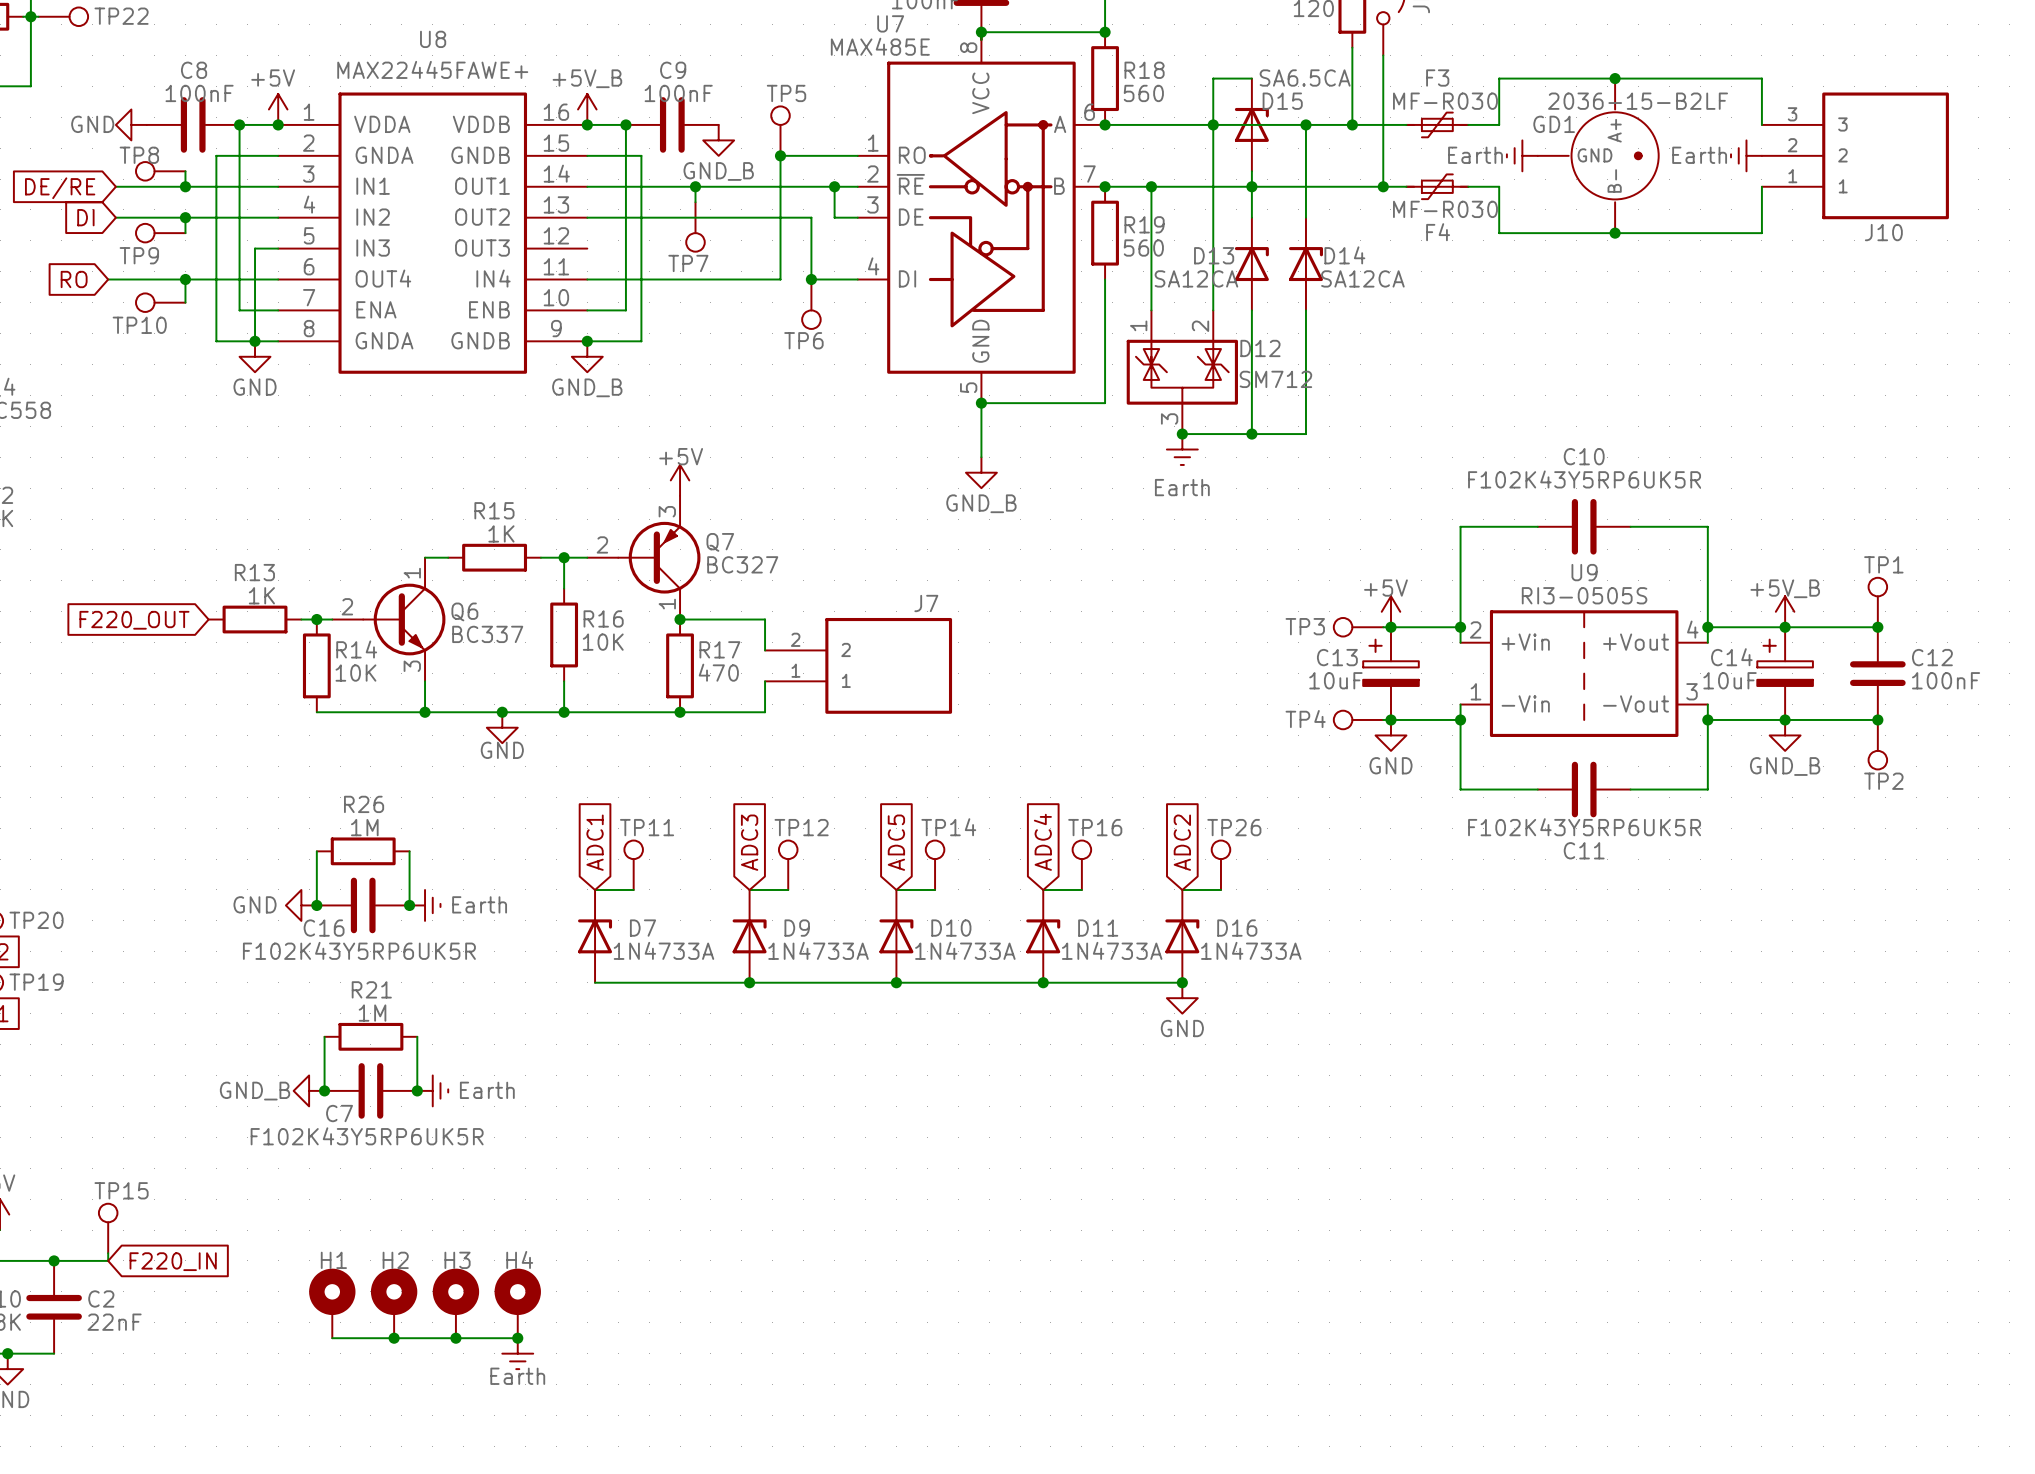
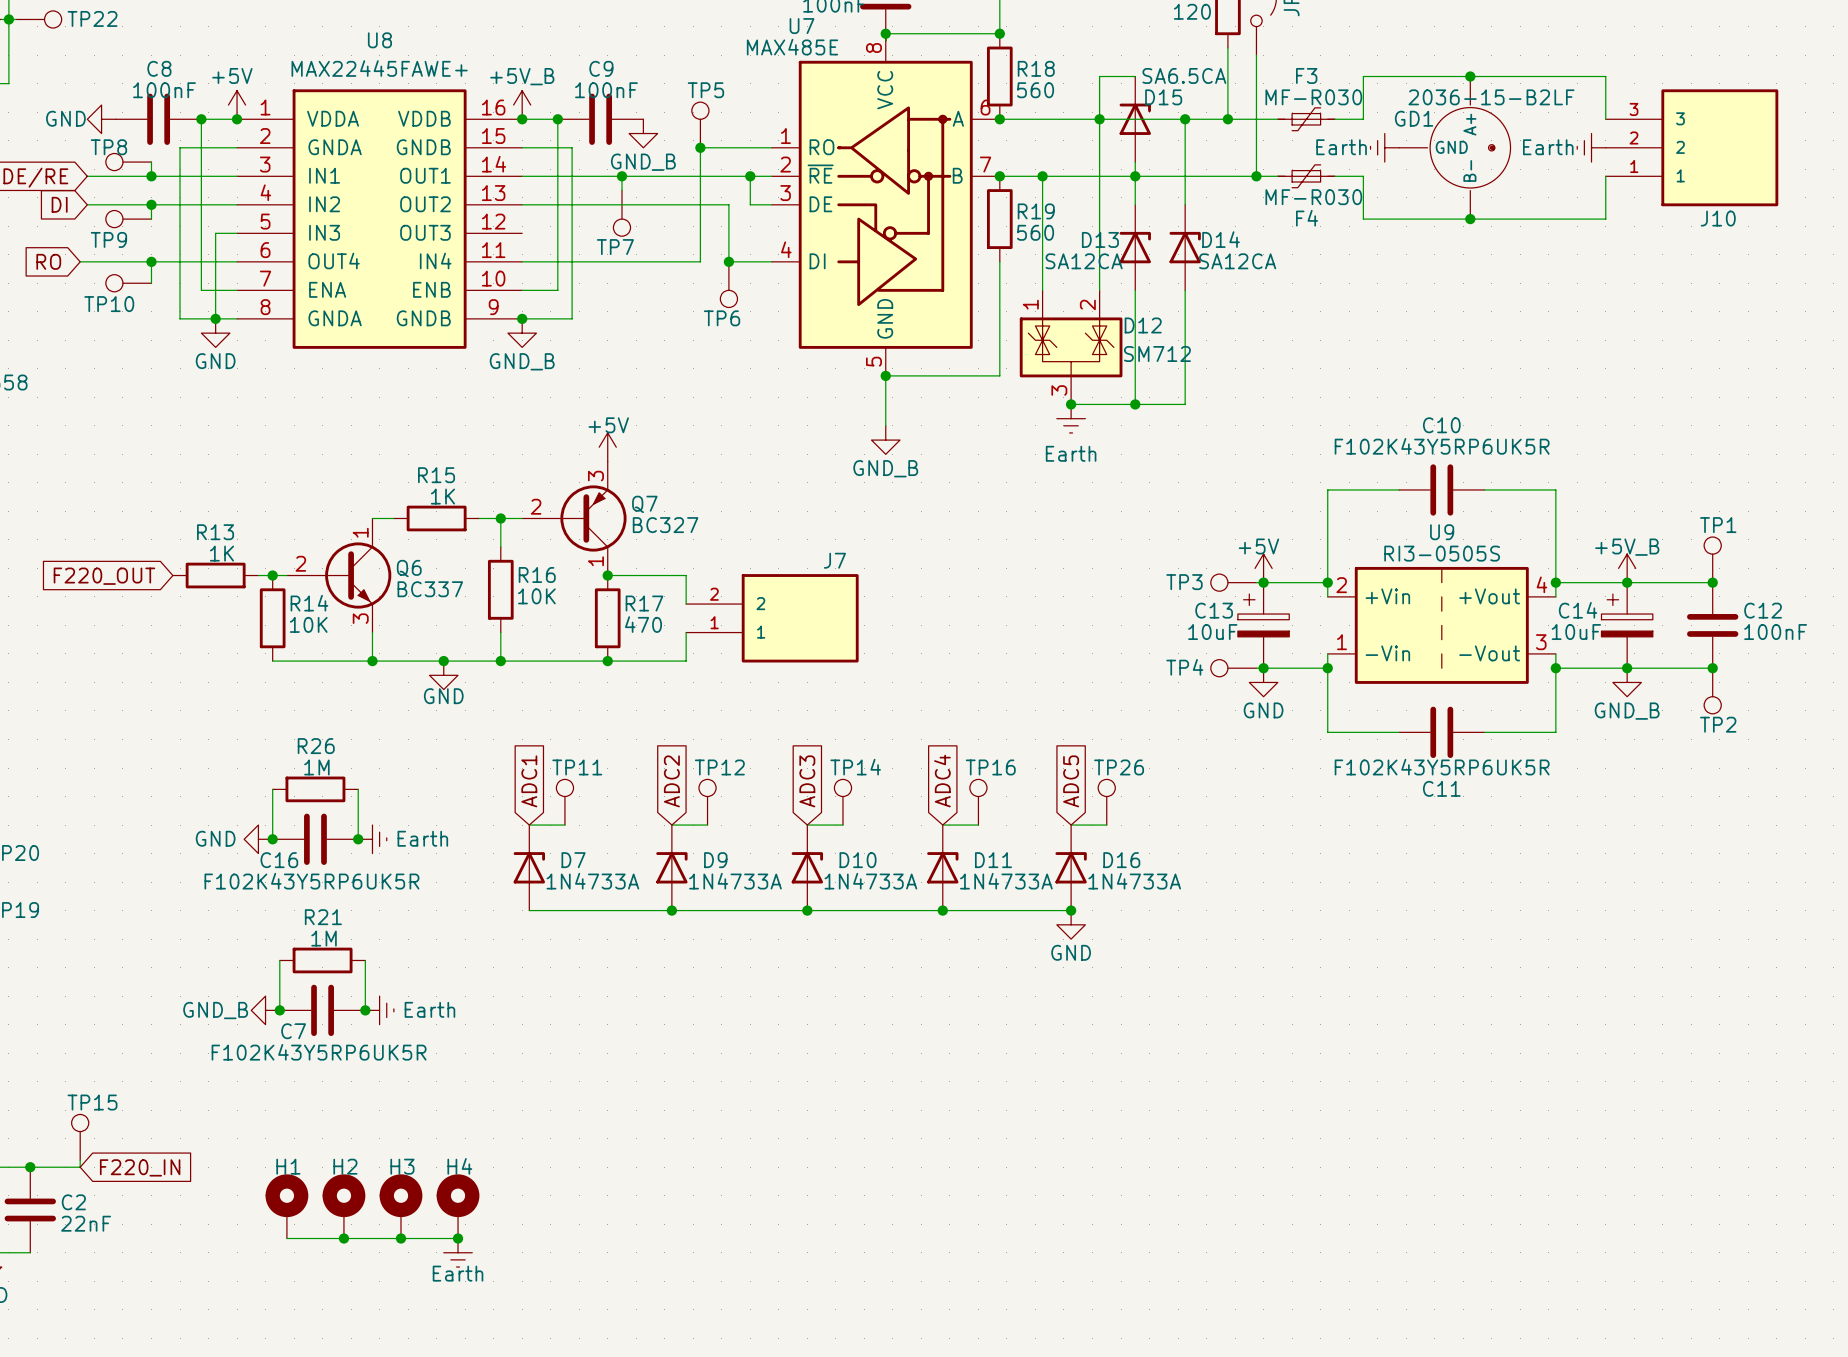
global label: ADC3 (749, 842) -> ADC2 (671, 781)
global label: ADC5 (896, 842) -> ADC3 (807, 781)
global label: ADC2 (1182, 842) -> ADC5 (1071, 781)

